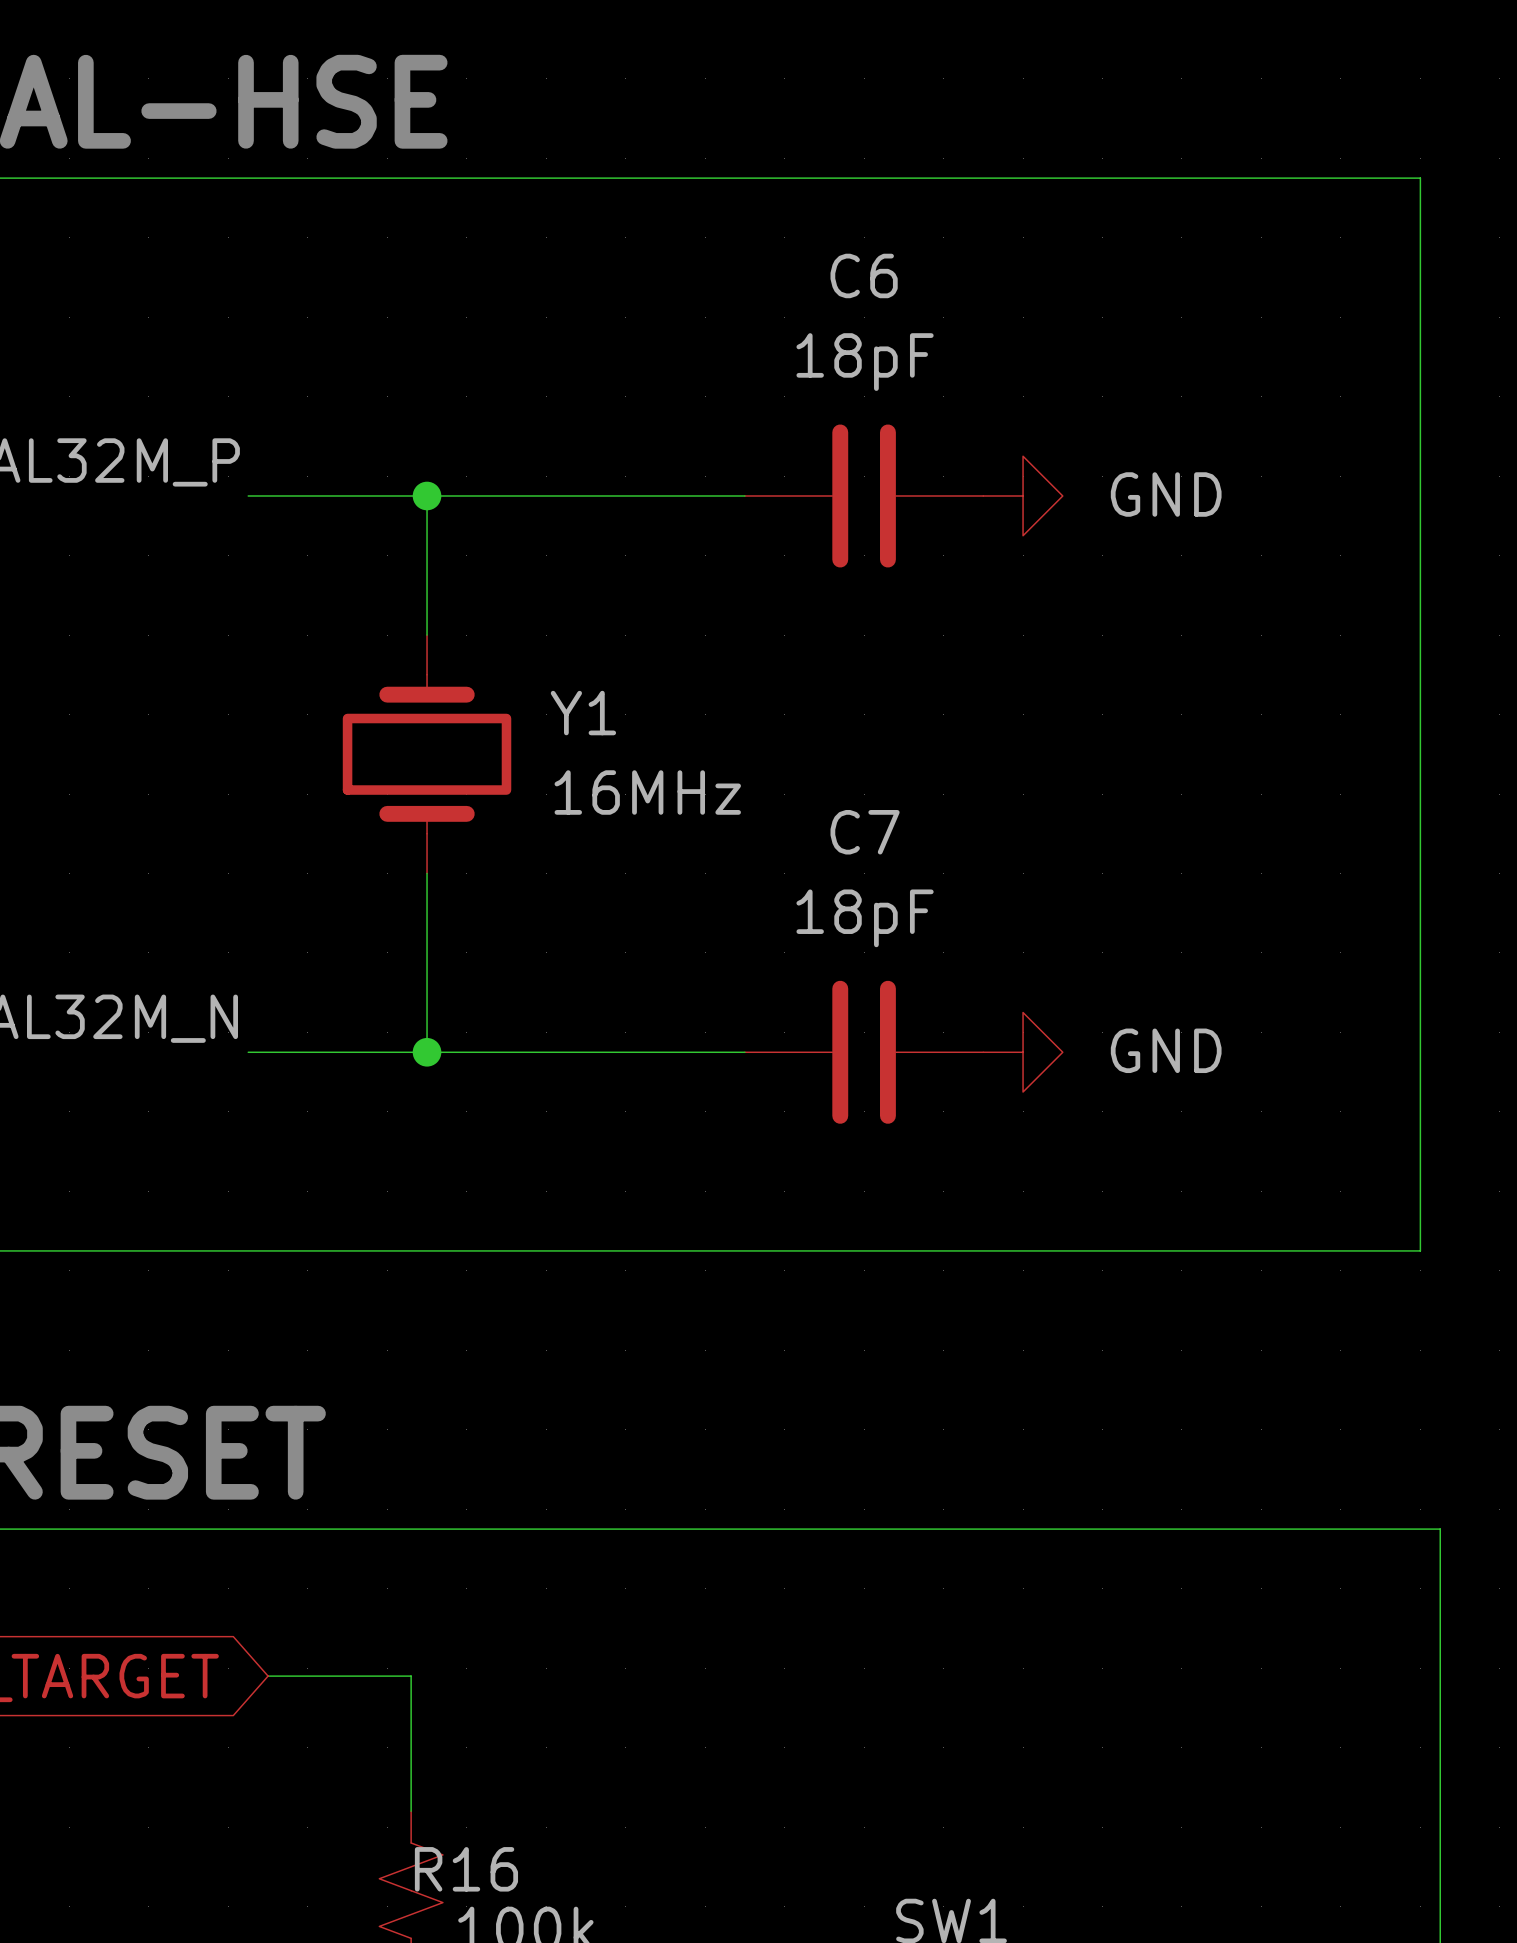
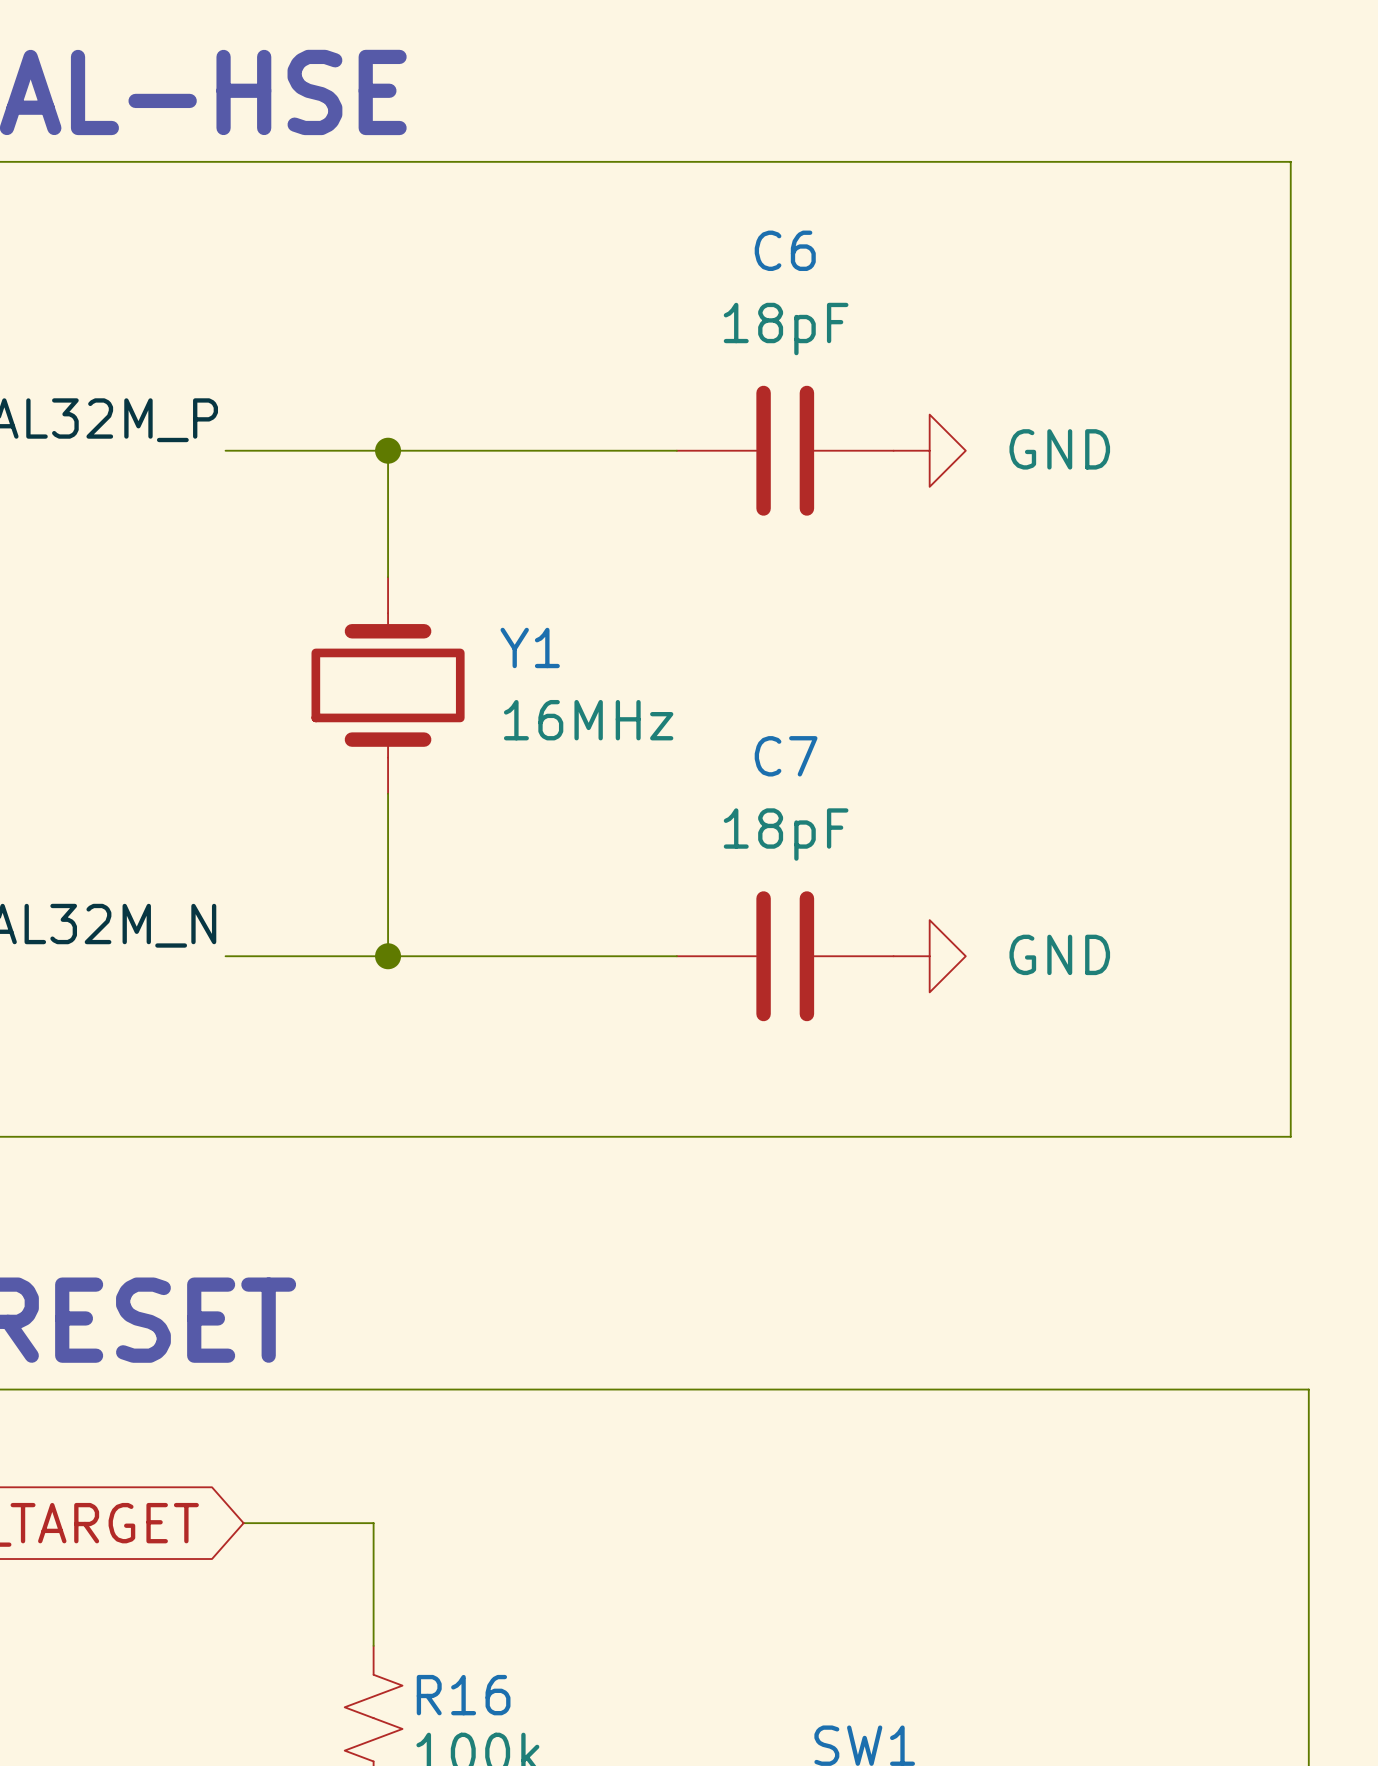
R16 name position: R16 (466, 1869) -> R16 (463, 1695)

